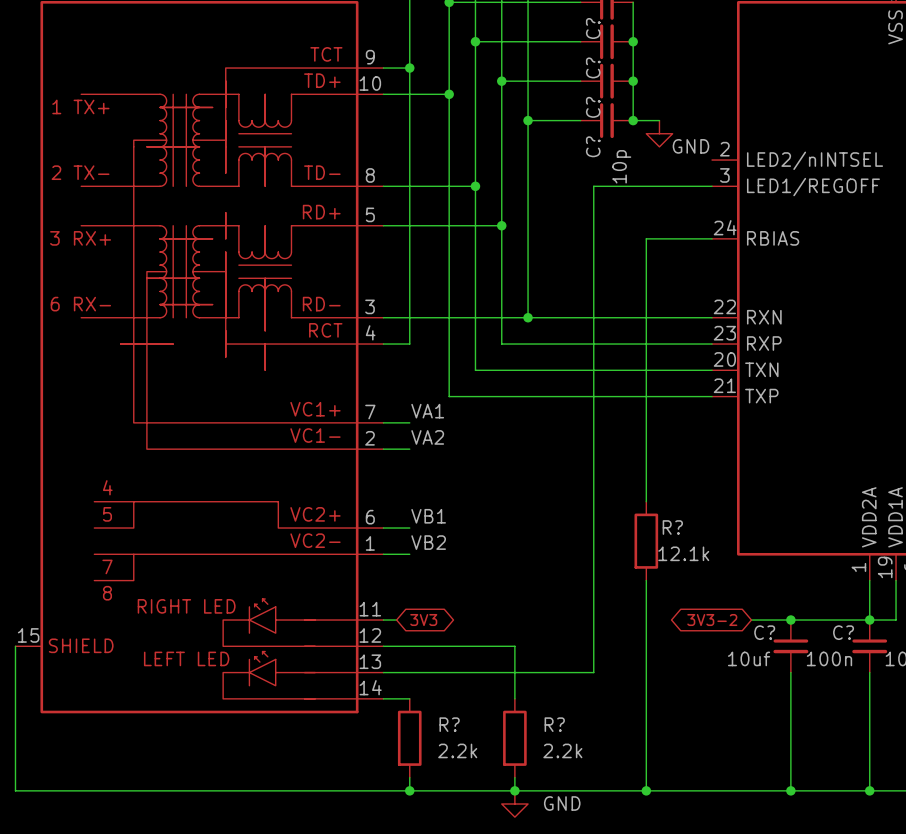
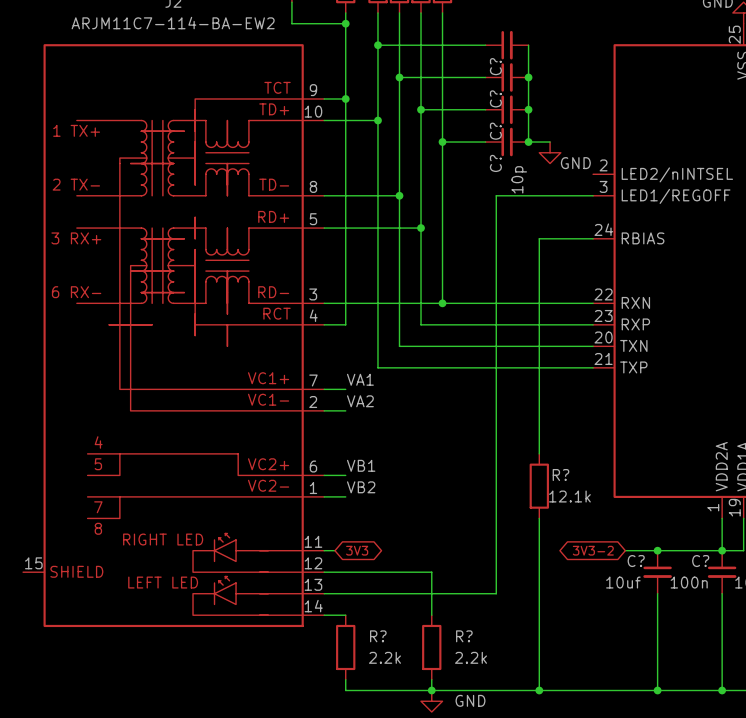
wire: (15, 646) (15, 790) (409, 790) -> none
junction: (409, 790) -> none

